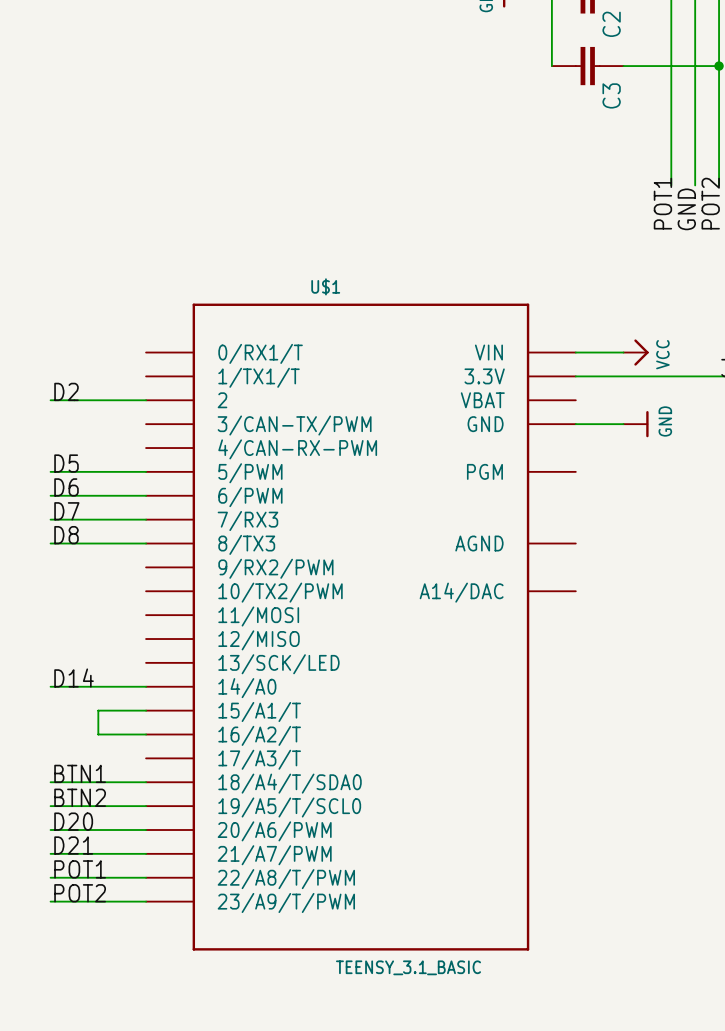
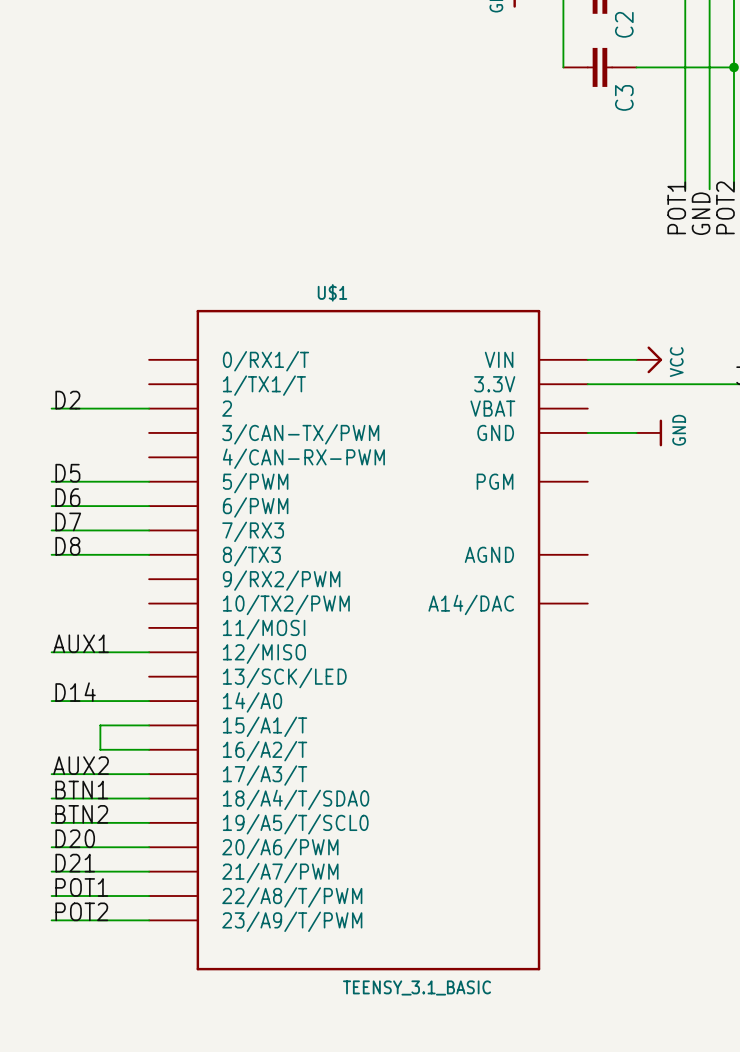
label: none -> AUX1 (81, 643)
wire: none -> (51, 652) (149, 652)
label: none -> AUX2 (81, 765)
wire: none -> (51, 774) (149, 774)

